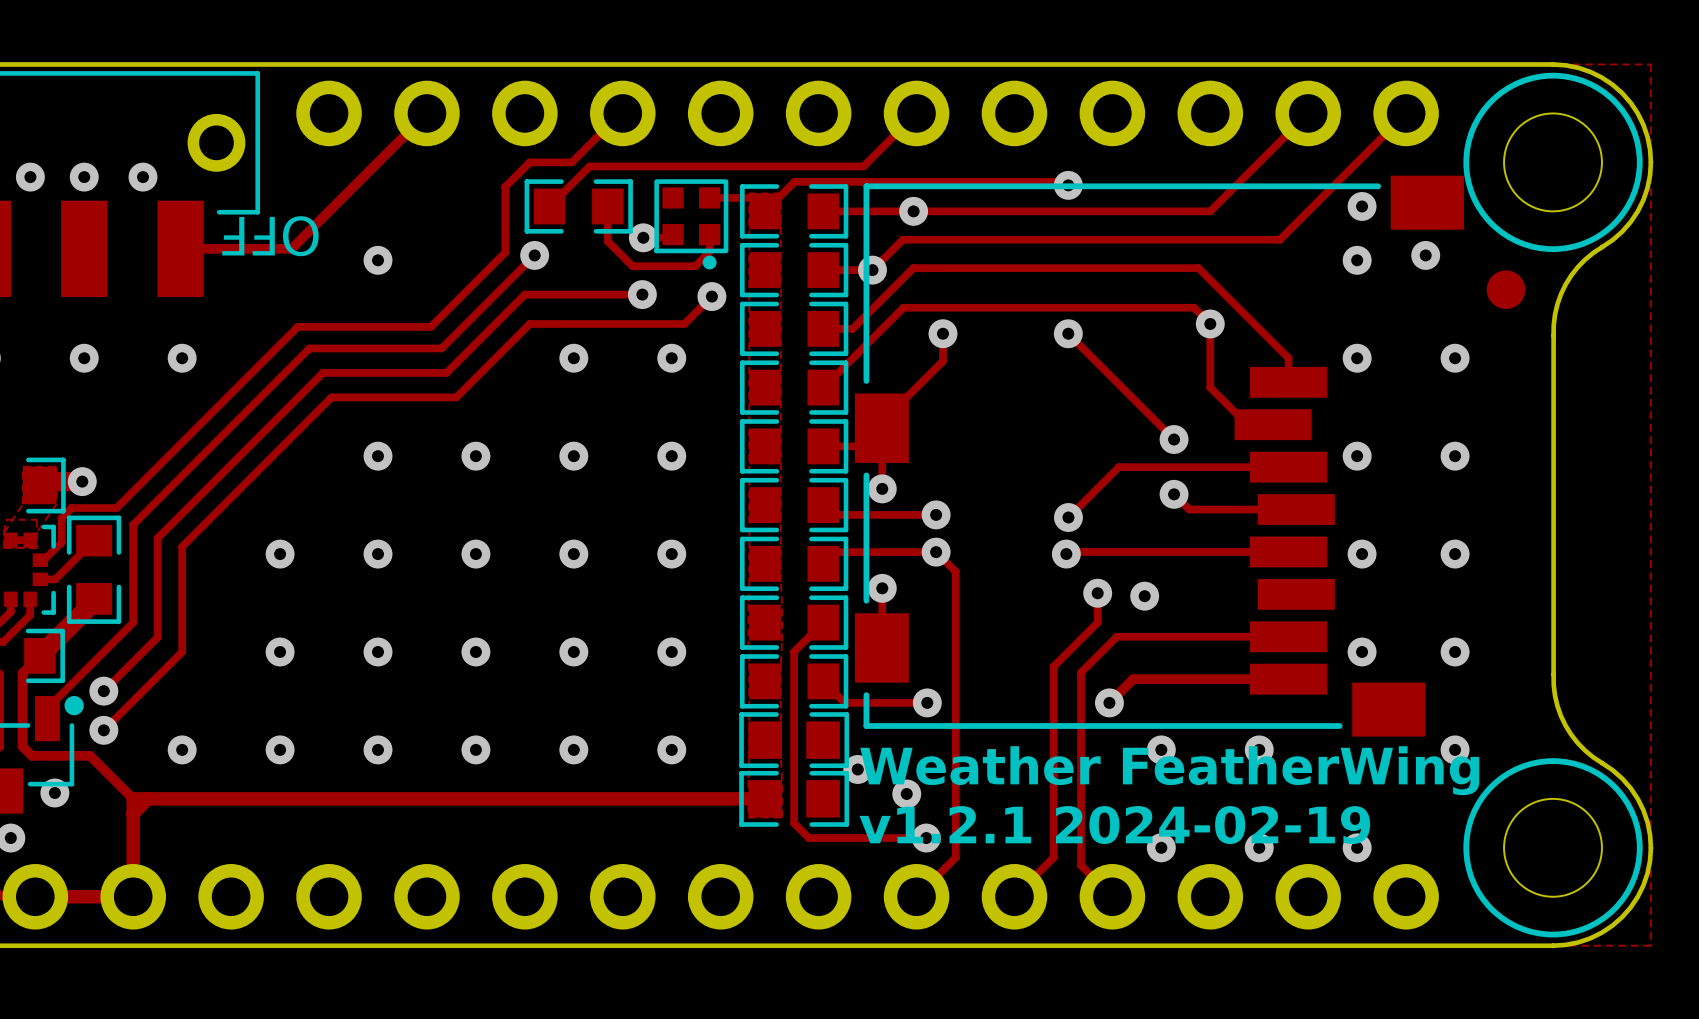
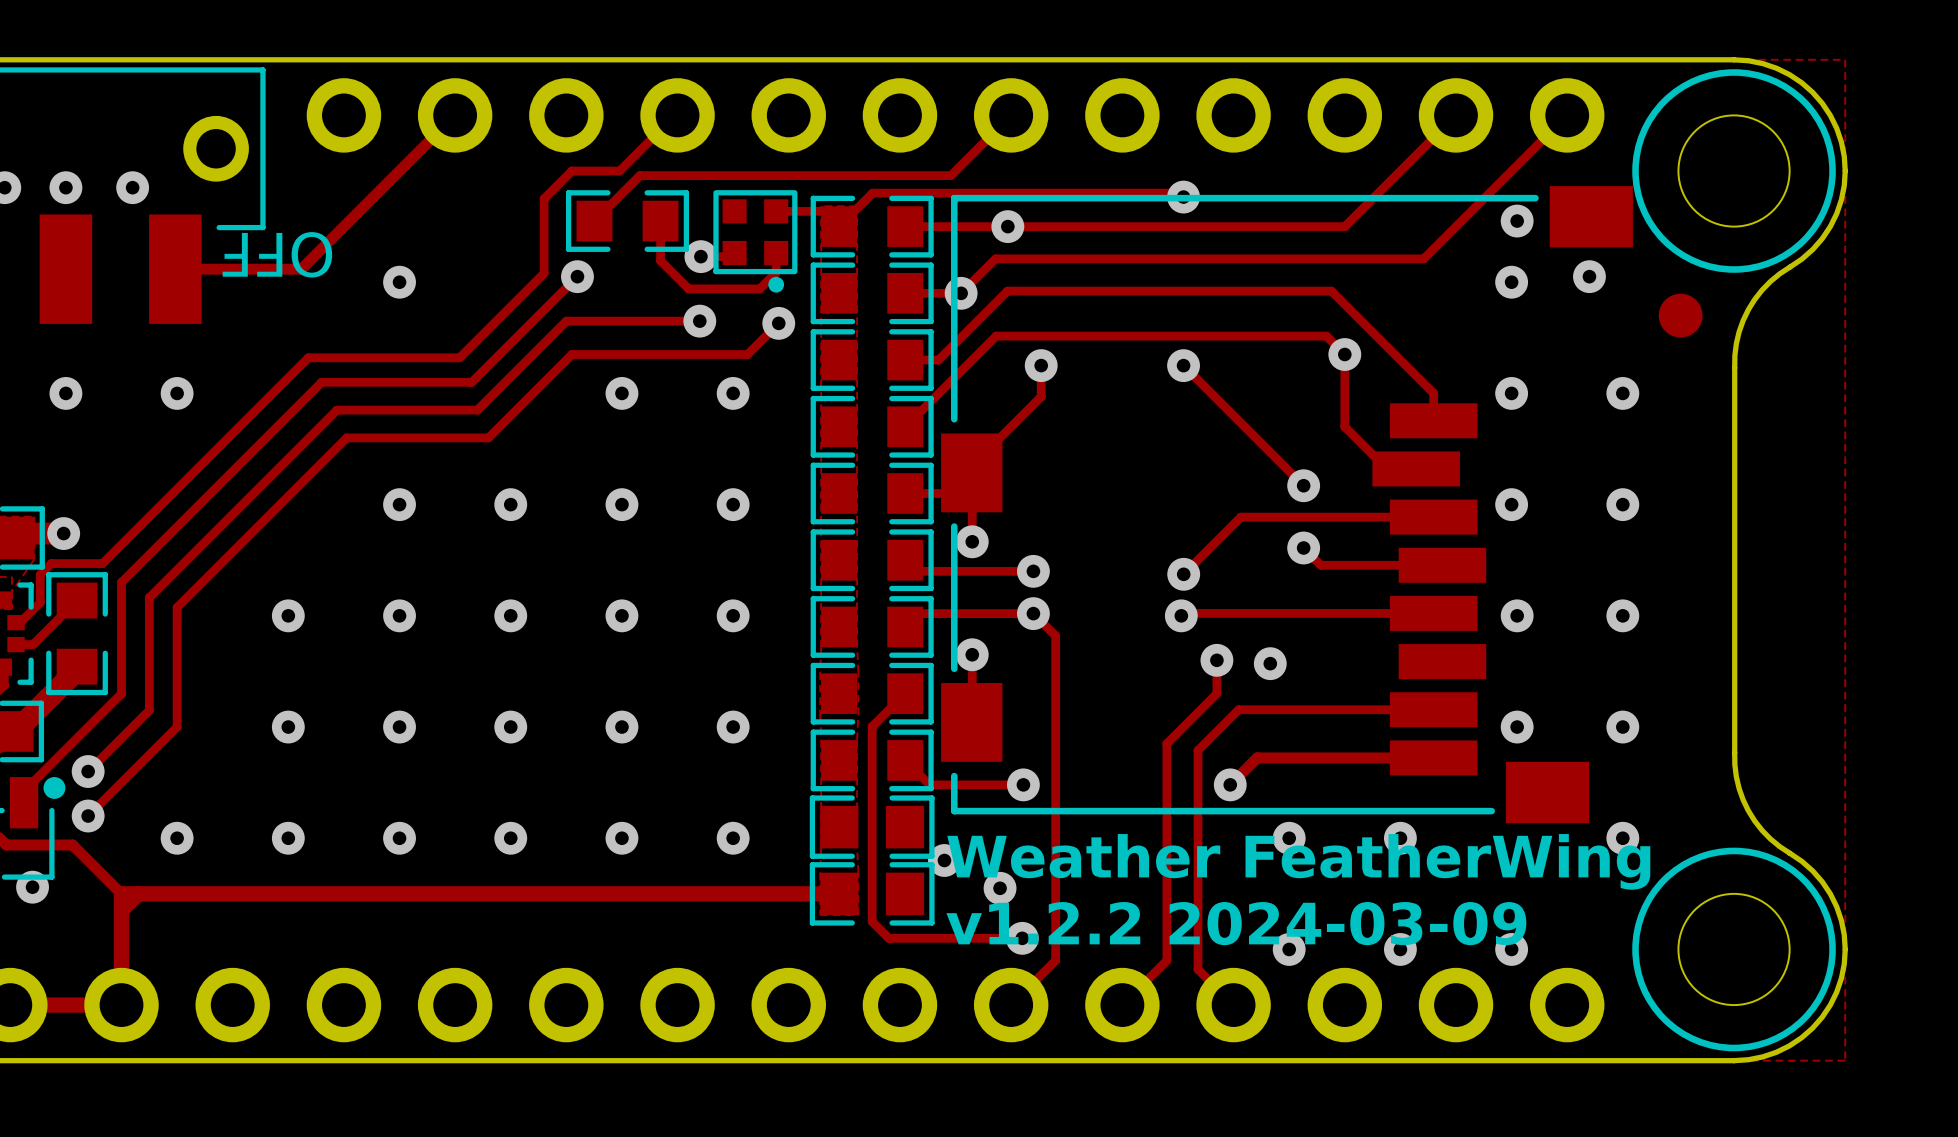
text: v1.2.1 2024-02-19 (1114, 825) -> v1.2.2 2024-03-09 (1236, 923)

